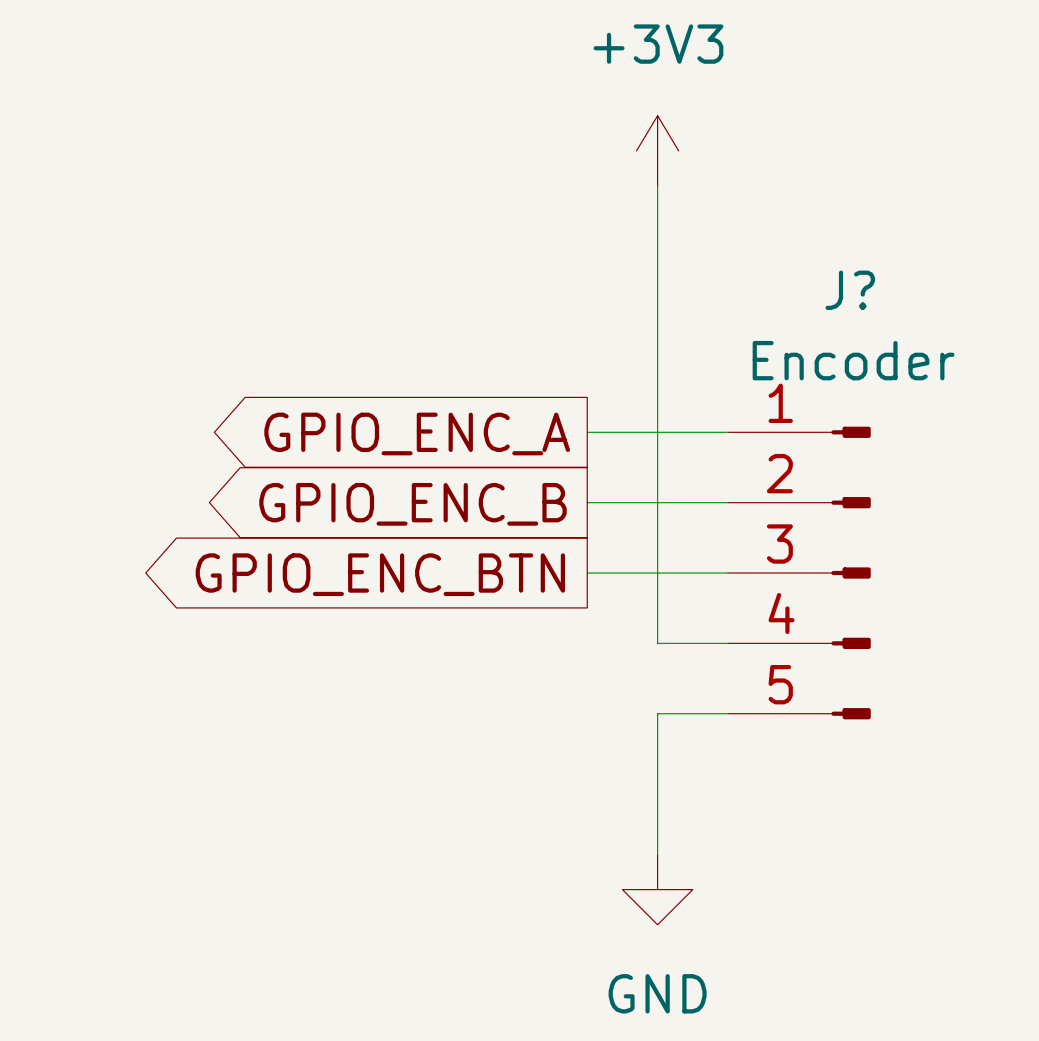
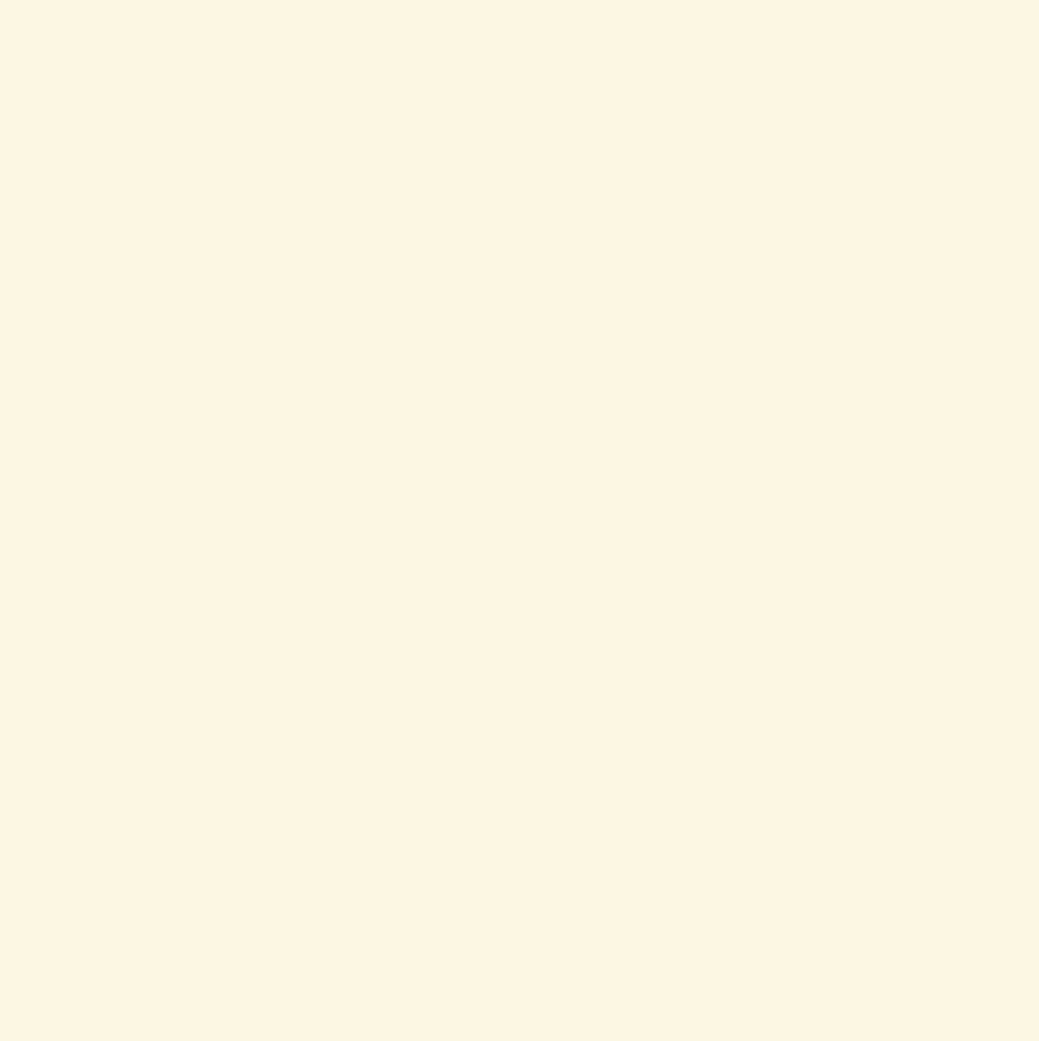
power symbol: +3V3 (657, 150) -> none
wire: (657, 186) (657, 643) (727, 643) -> none
wire: (587, 432) (727, 432) -> none
global label: GPIO_ENC_A (417, 433) -> none
wire: (587, 502) (727, 502) -> none
global label: GPIO_ENC_B (413, 504) -> none
wire: (587, 573) (727, 573) -> none
J?: Encoder (799, 573) -> none
global label: GPIO_ENC_BTN (380, 574) -> none
wire: (727, 713) (657, 713) (657, 854) -> none
power symbol: GND (657, 889) -> none

